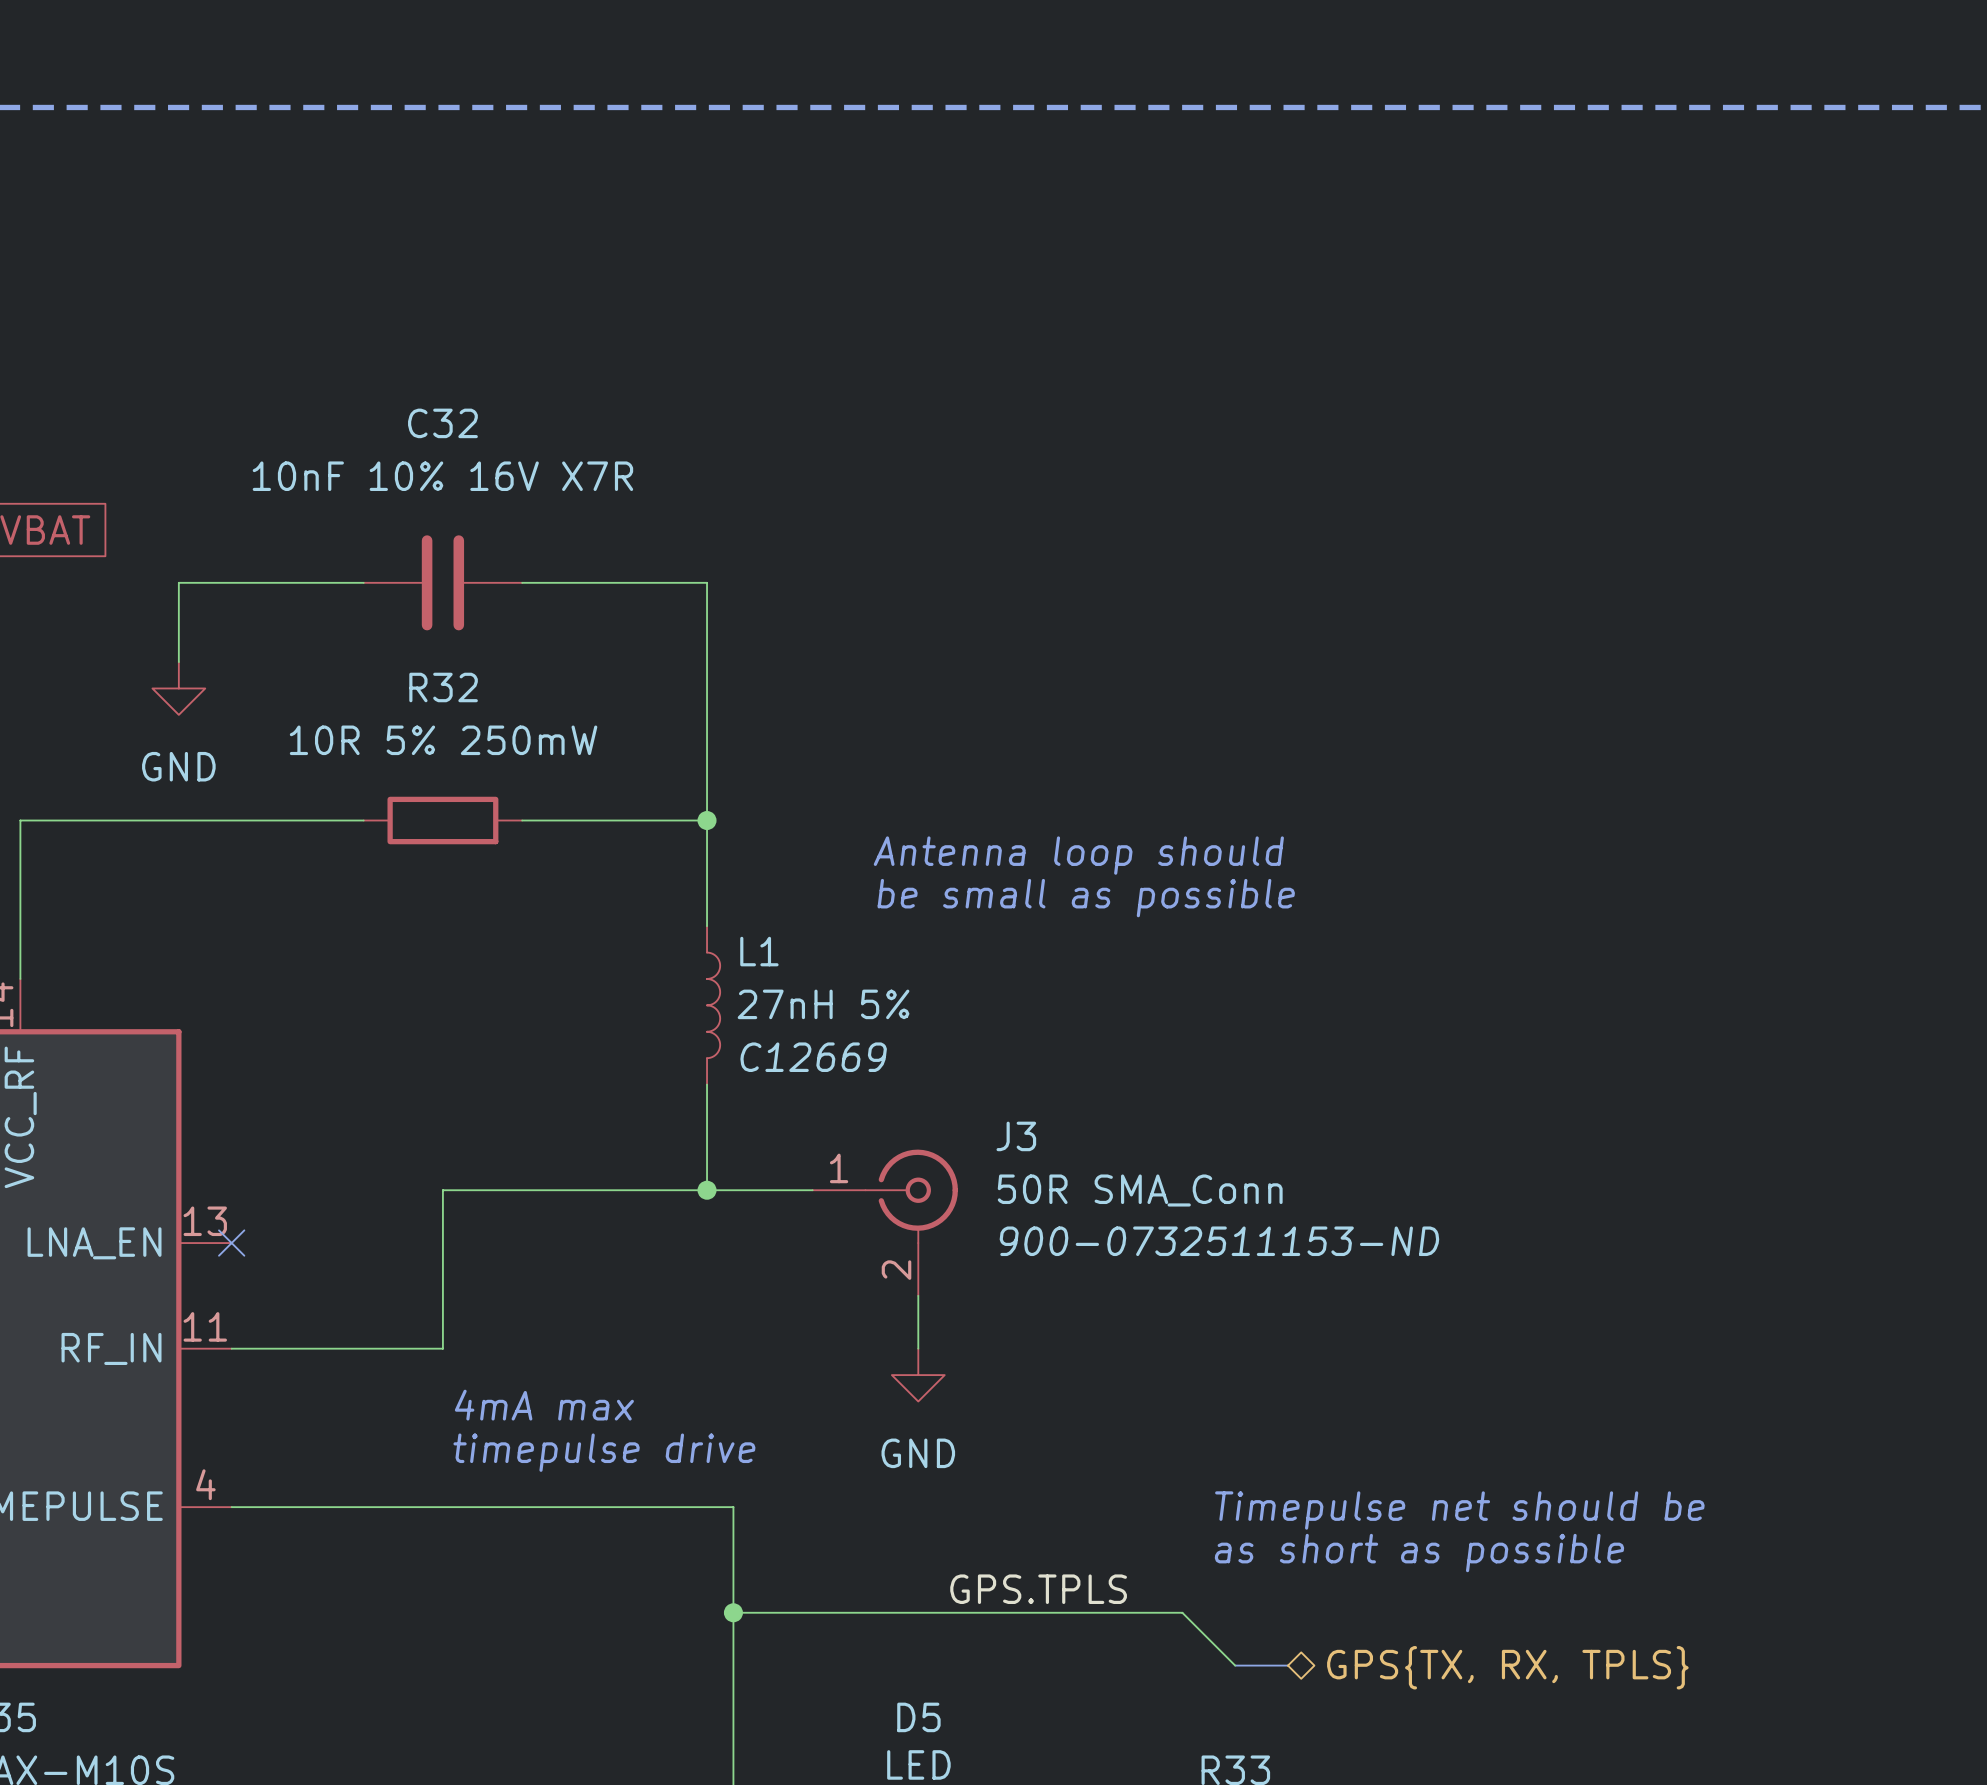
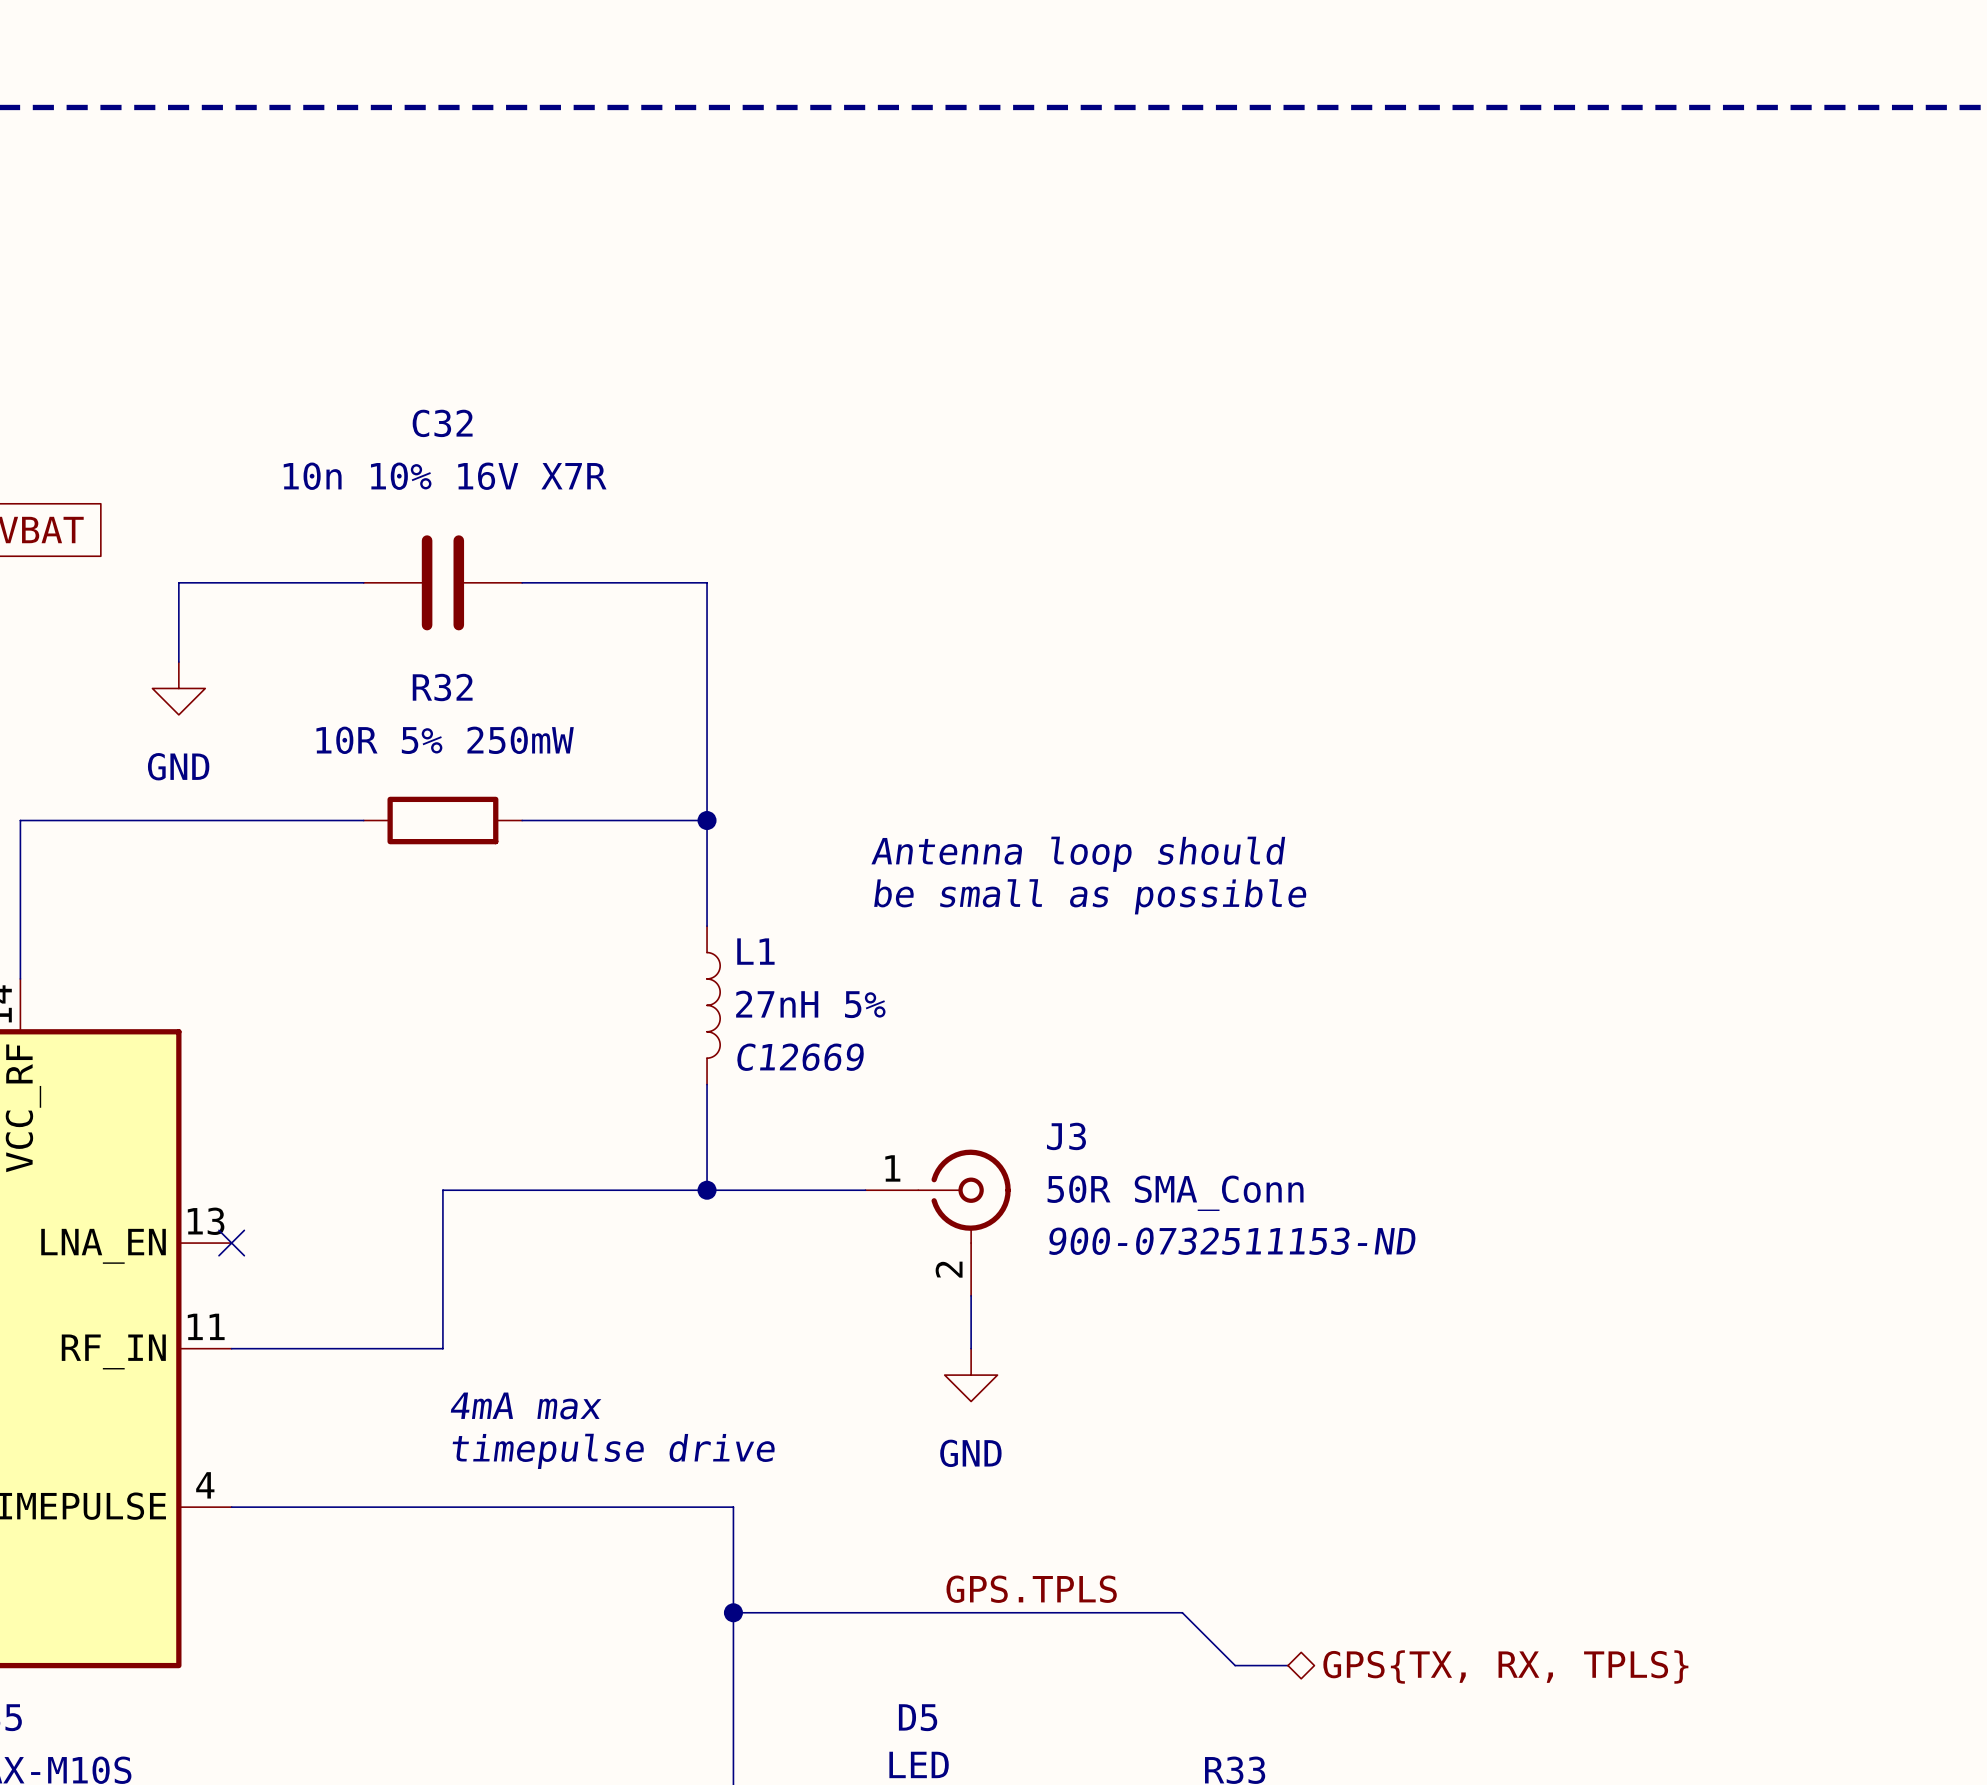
C32 value: 10nF 10% 16V X7R (442, 476) -> 10n 10% 16V X7R (445, 476)
J3 position: (885, 1222) -> (938, 1222)
wire: (918, 1295) (918, 1348) -> (971, 1295) (971, 1348)
power symbol position: GND (918, 1375) -> GND (971, 1375)
text: Timepulse net should be (1459, 1510) -> none
text: as short as possible (1419, 1553) -> none

